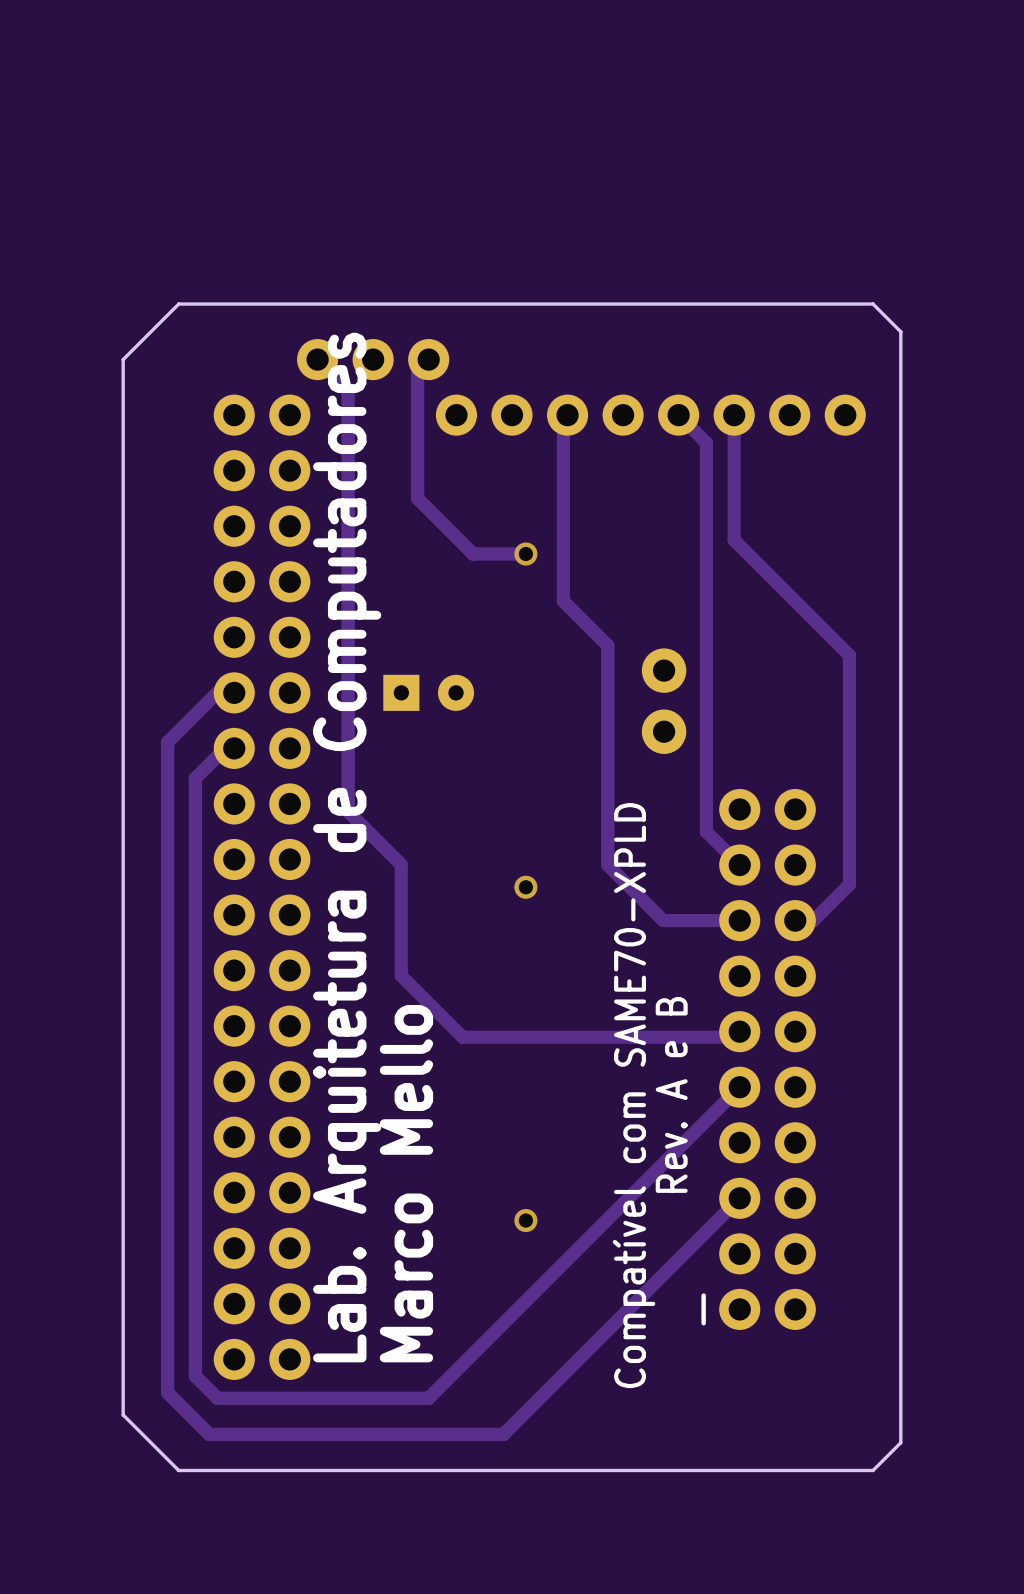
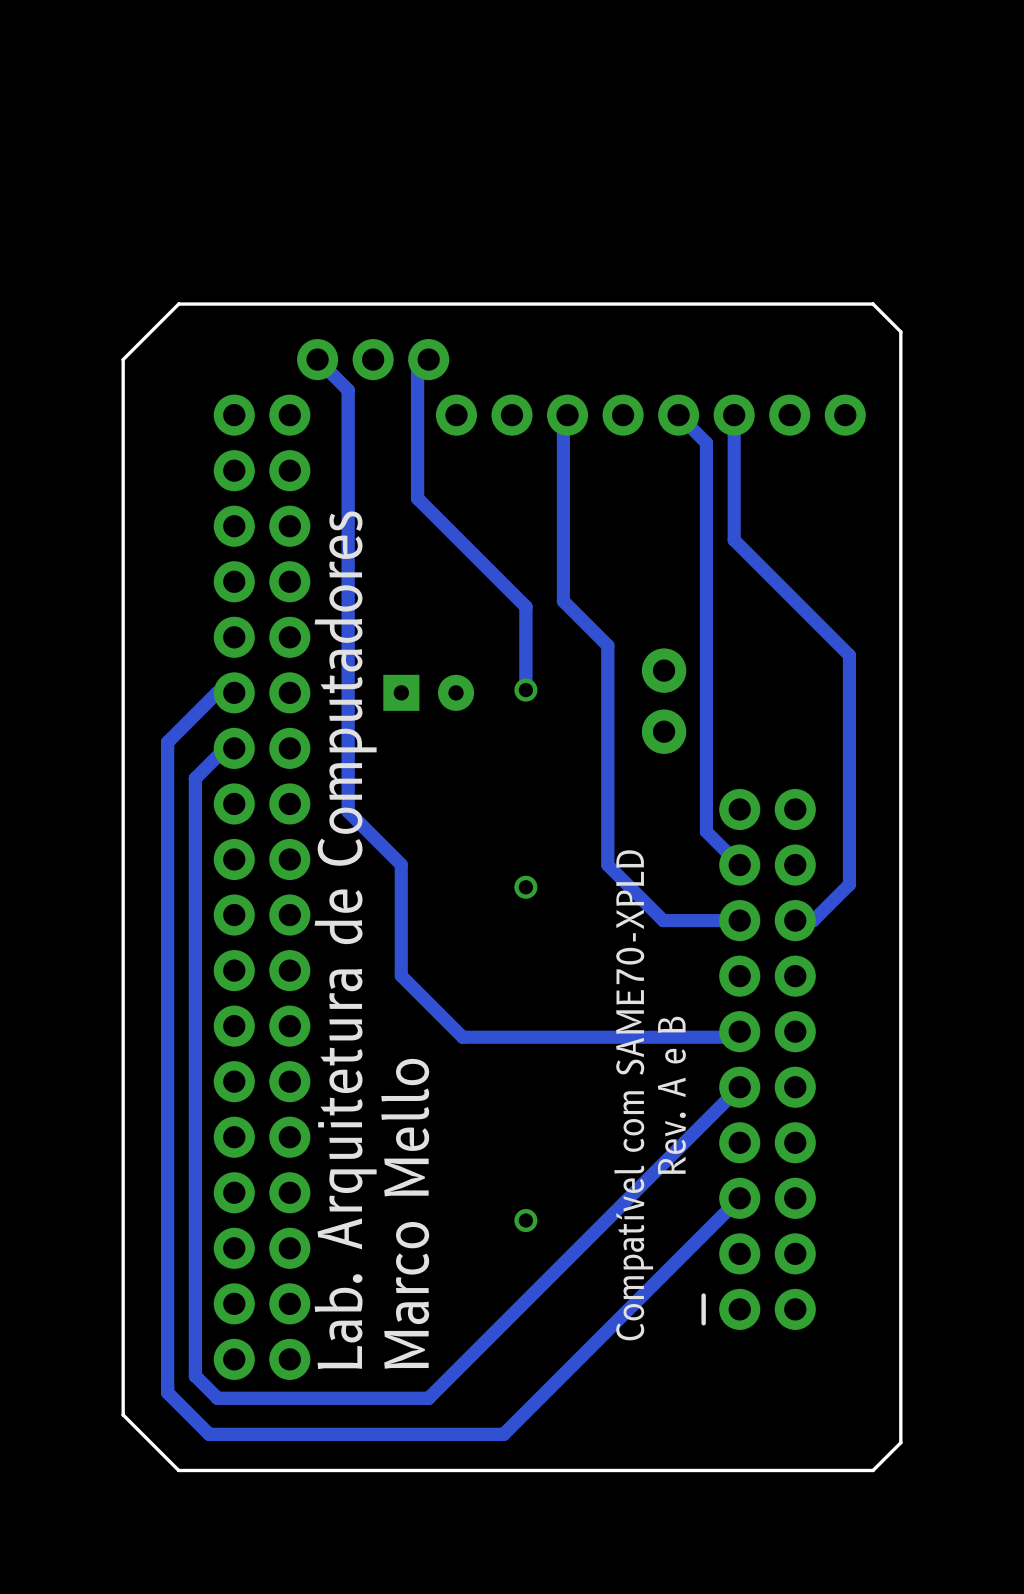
track: (525, 553) (473, 553) -> (525, 690) (525, 606) (473, 553)
via: (525, 553) -> none
via: none -> (525, 690)

